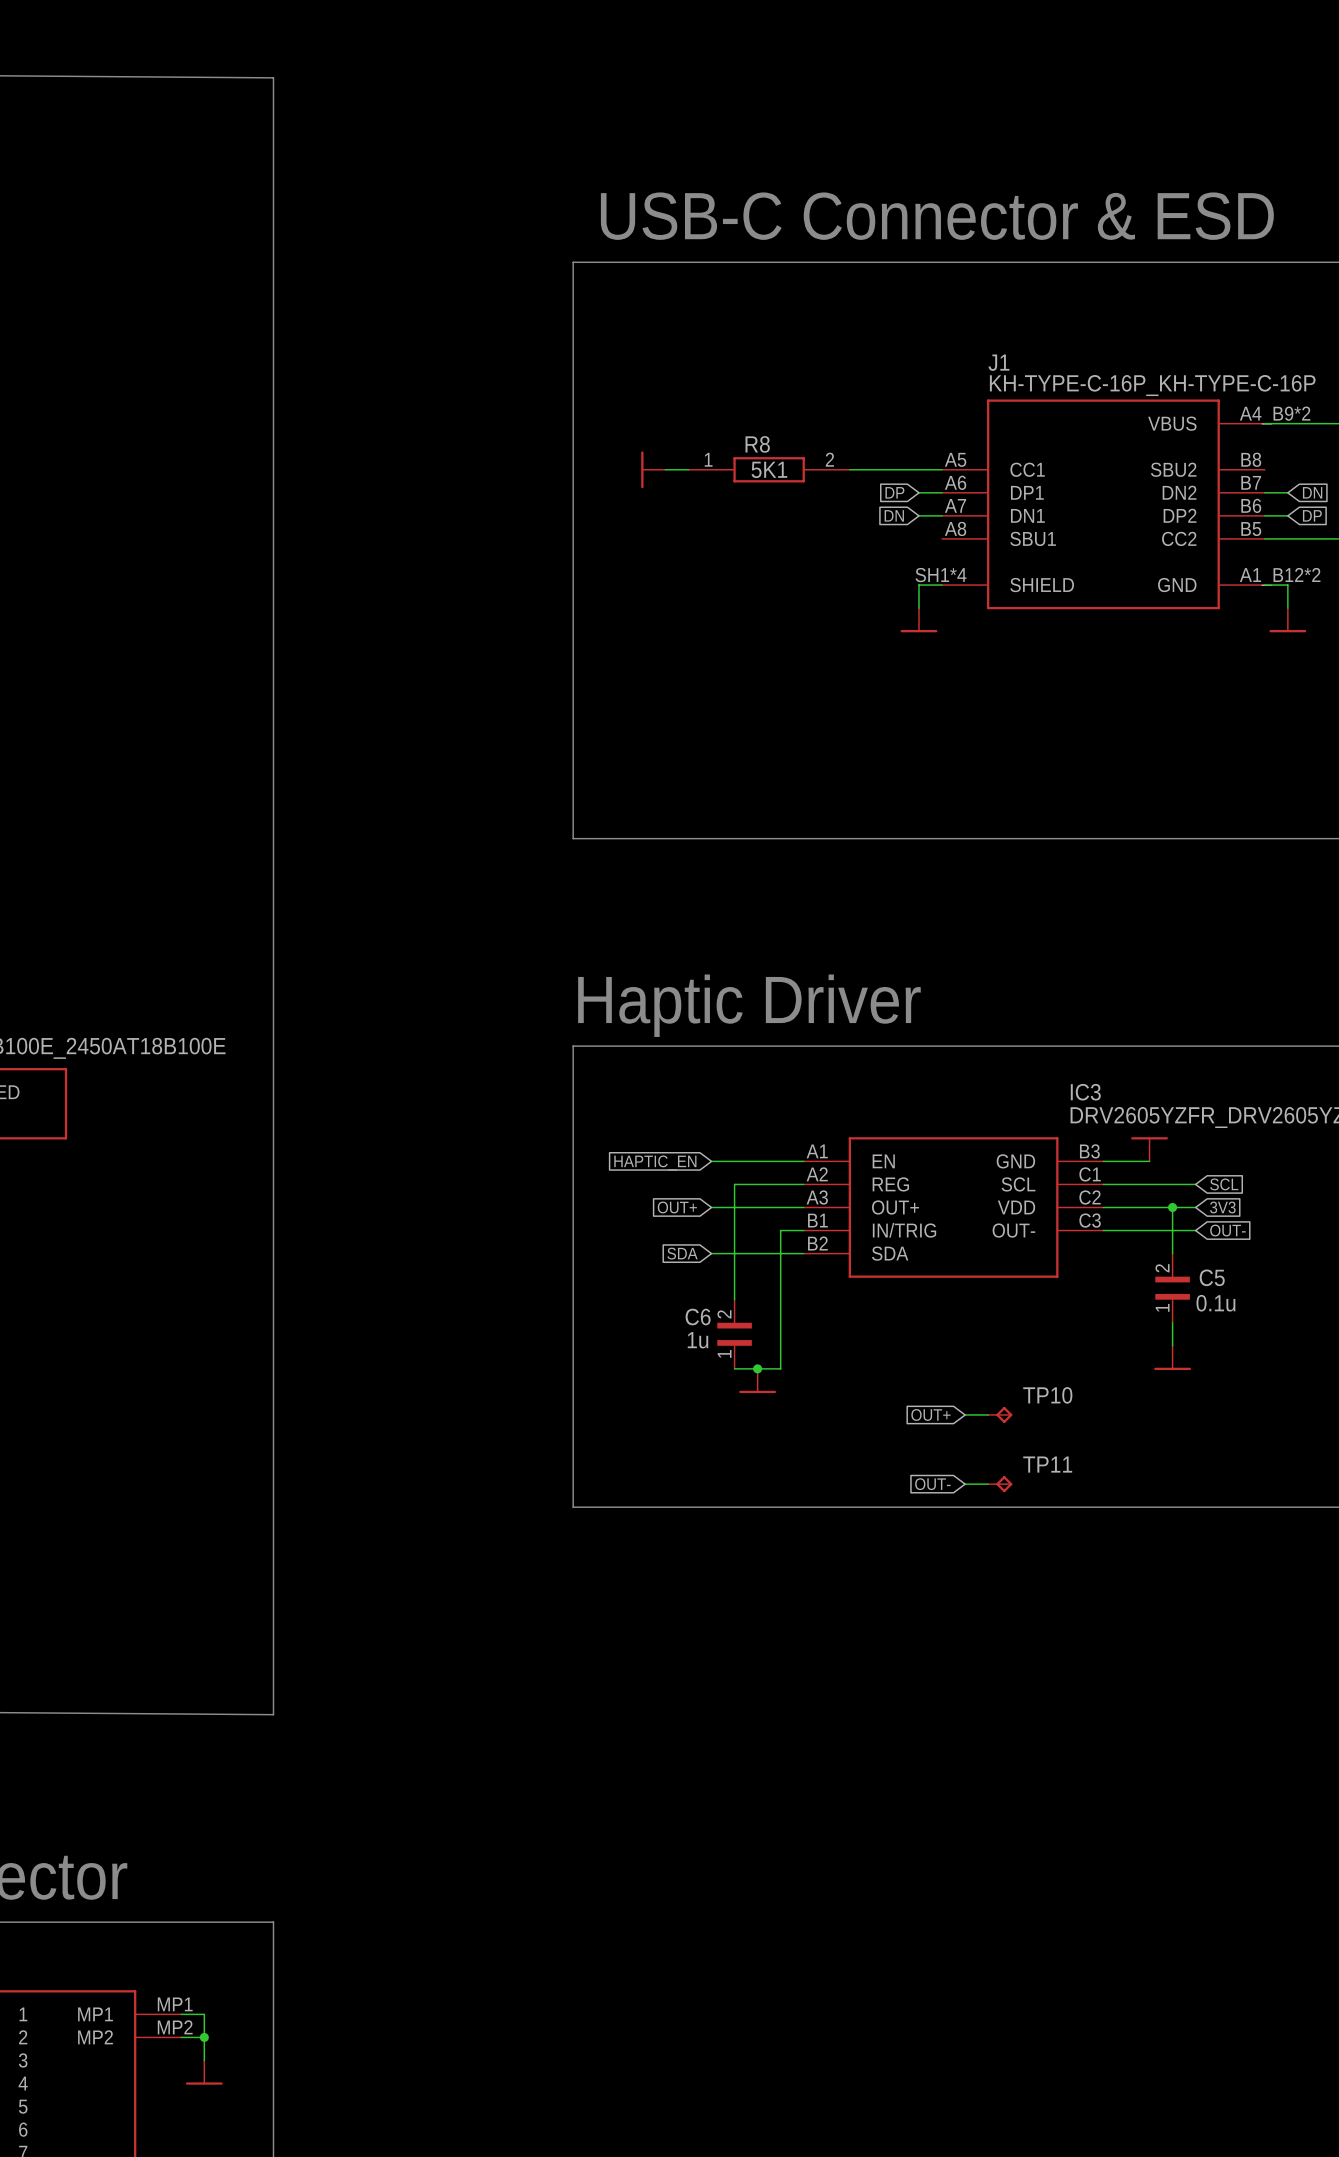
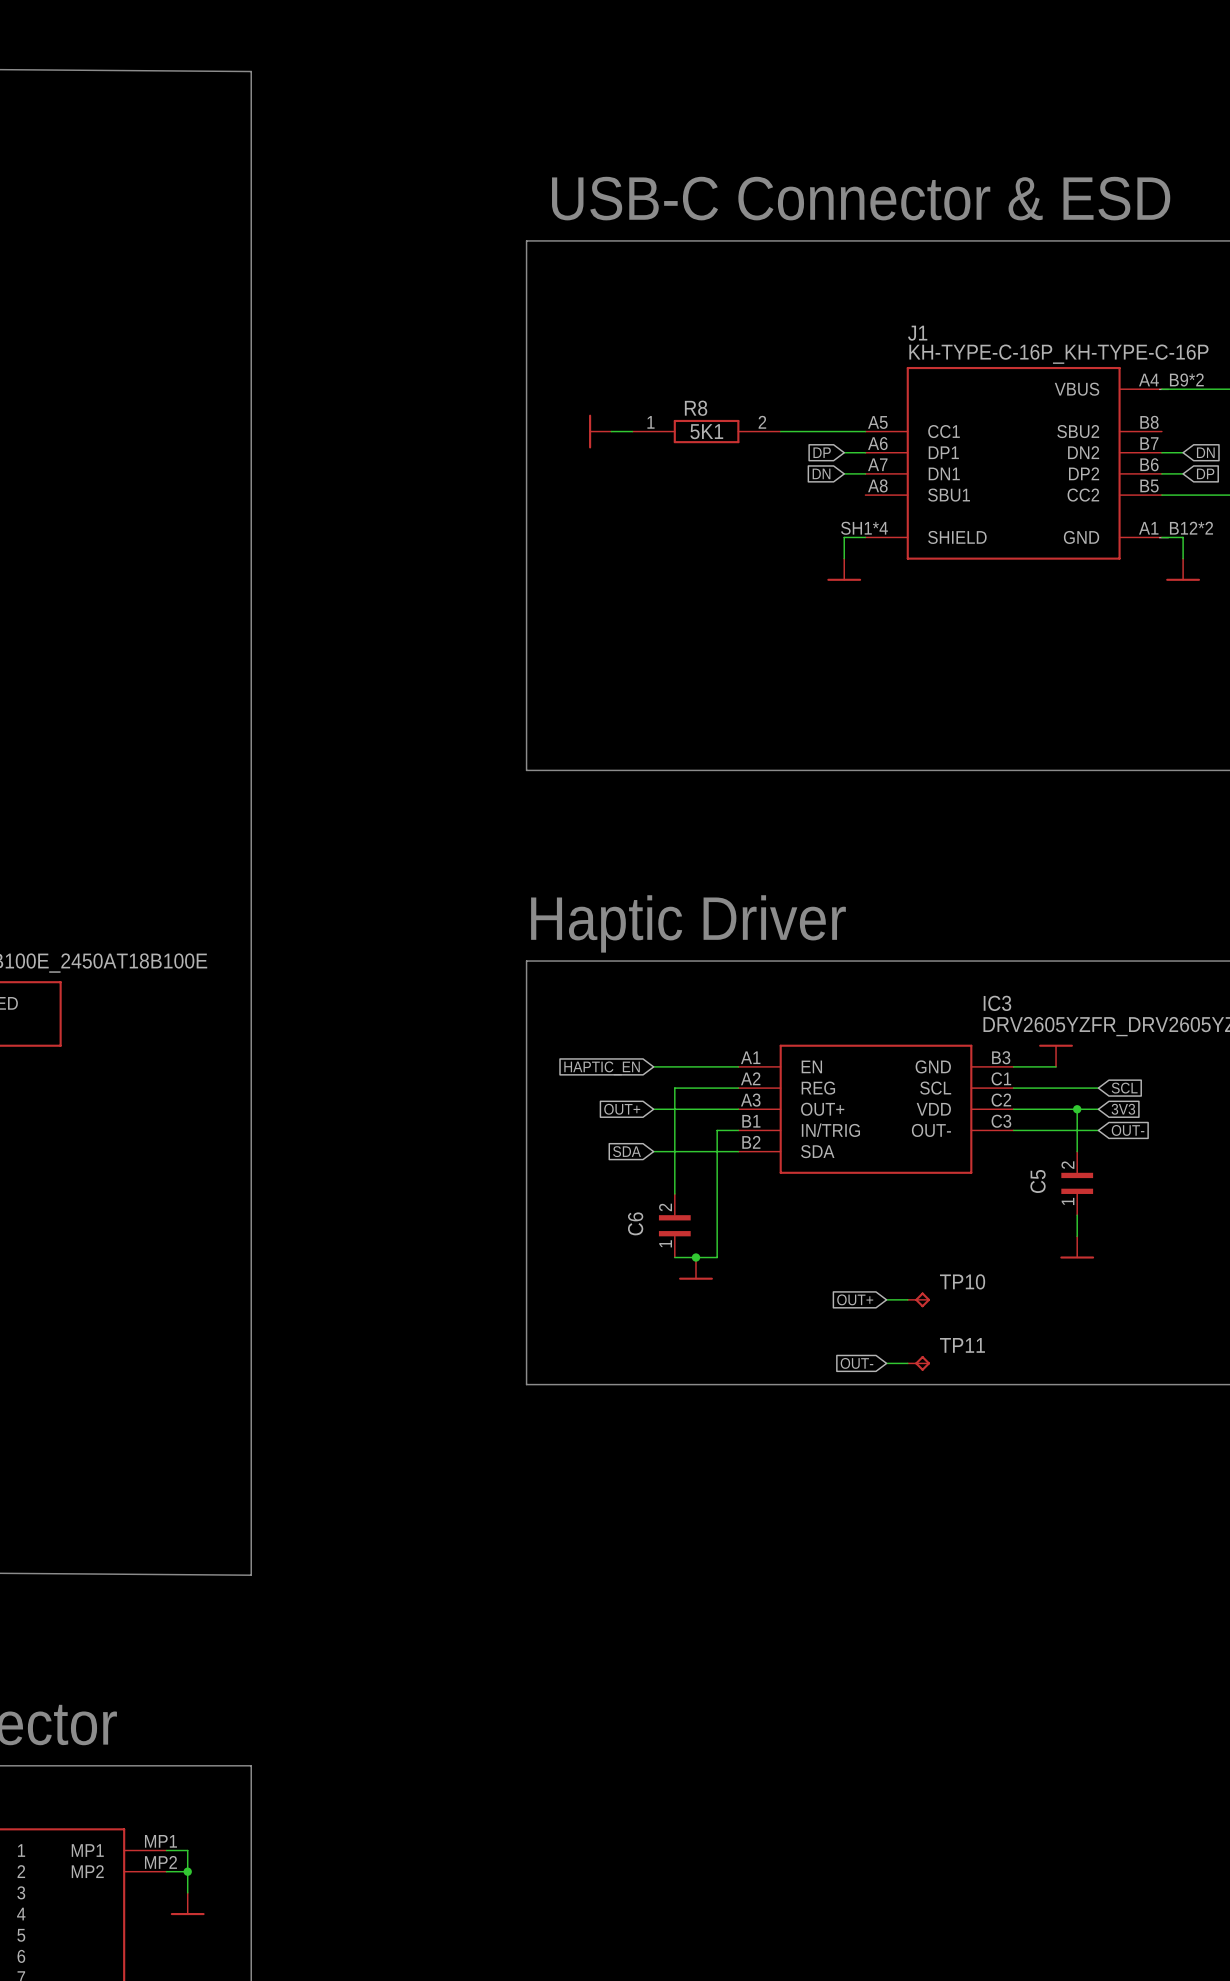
C5 name rotation: 0° (1212, 1277) -> 90° counterclockwise (1038, 1181)
C5 name position: C5 (1212, 1277) -> C5 (1038, 1181)
C5 value: 0.1u (1215, 1303) -> none
C6 name rotation: 0° (698, 1317) -> 90° counterclockwise (635, 1223)
C6 value: 1u (698, 1340) -> none

